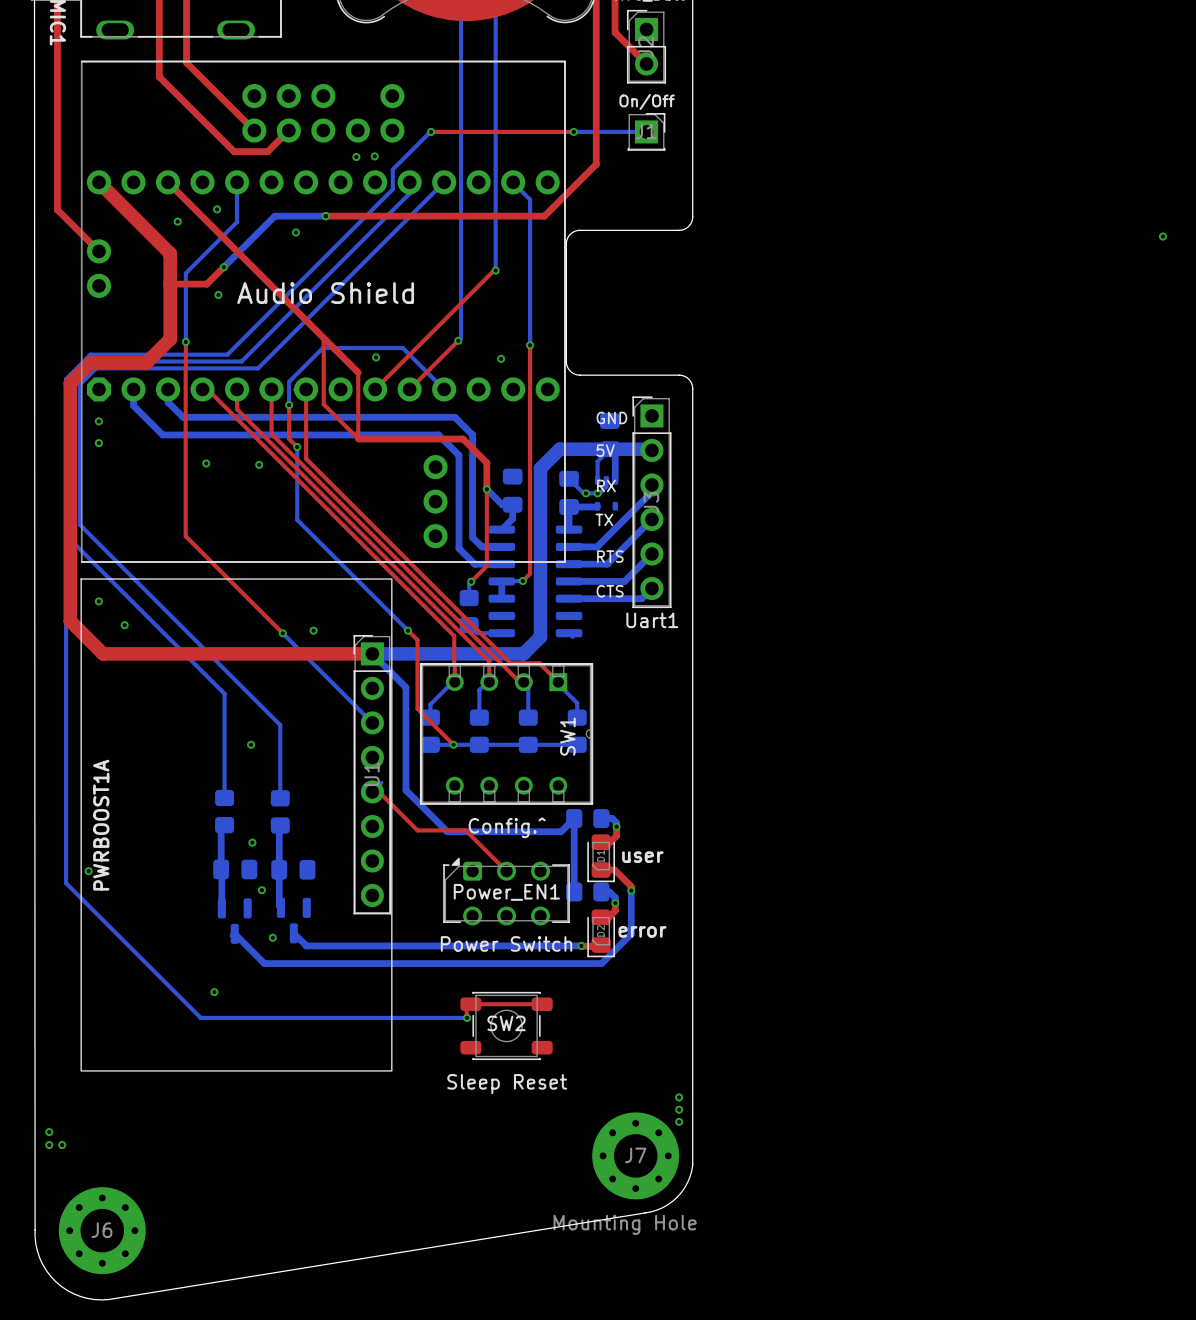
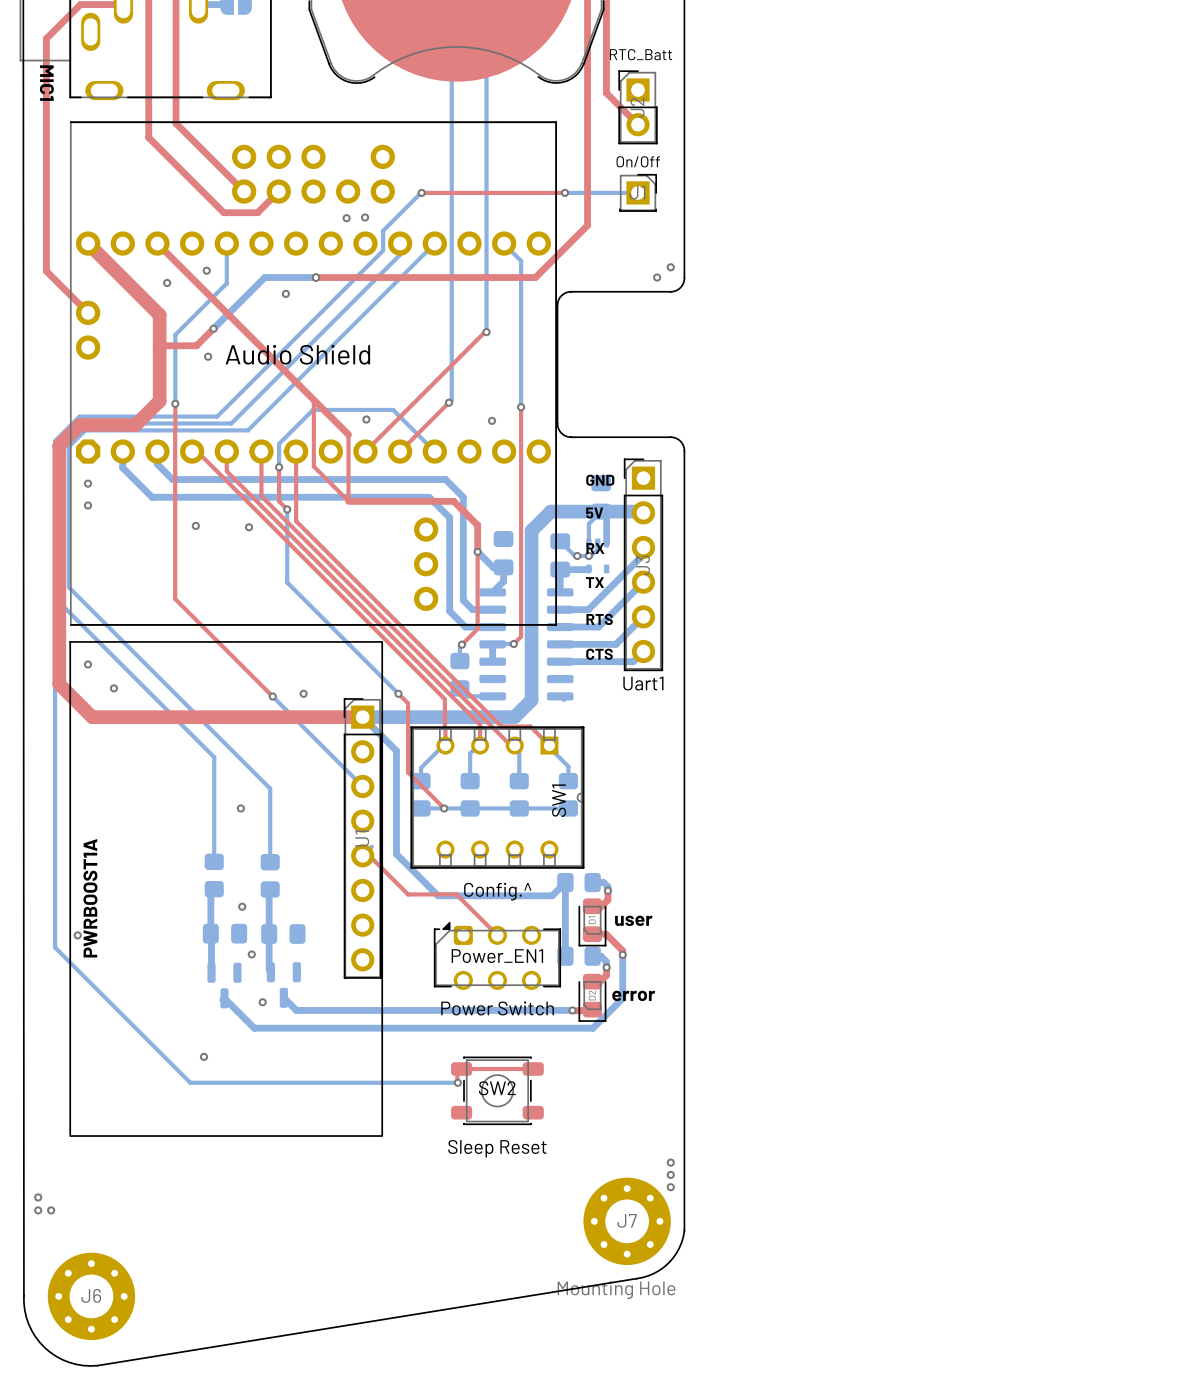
via: none -> (670, 267)
via: none -> (657, 277)
via: (1162, 236) -> none

